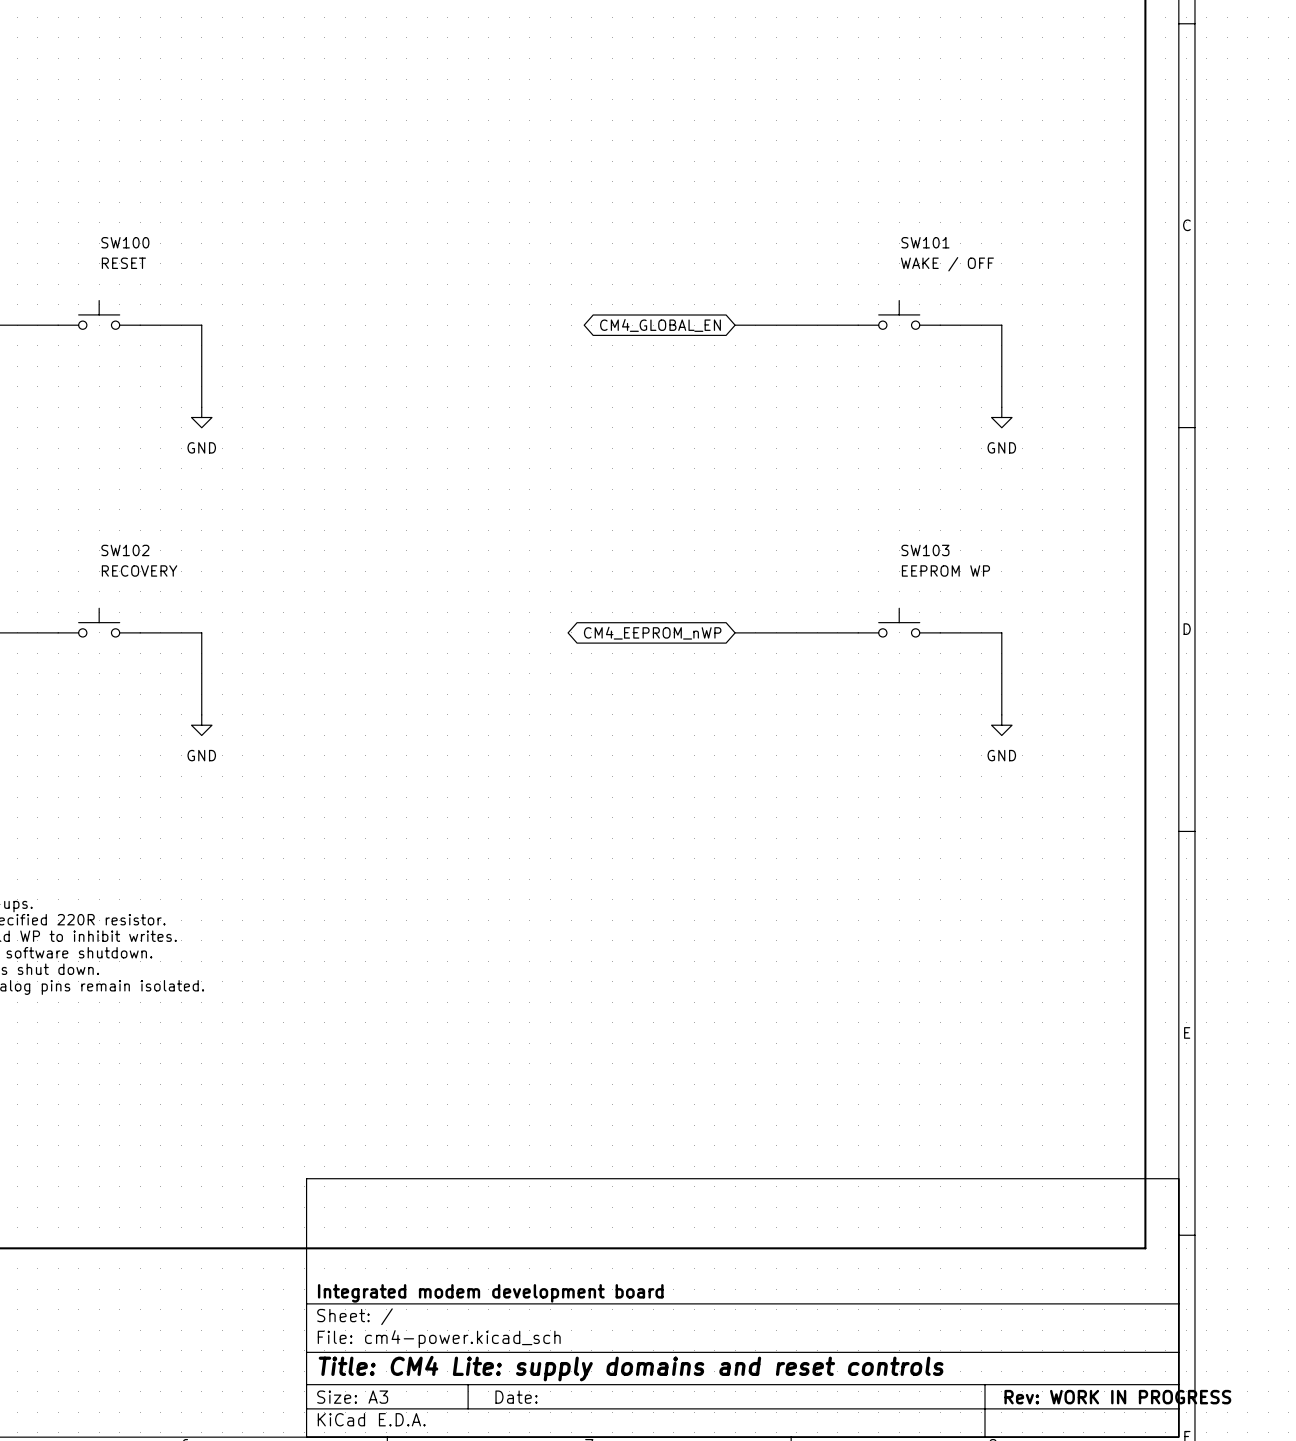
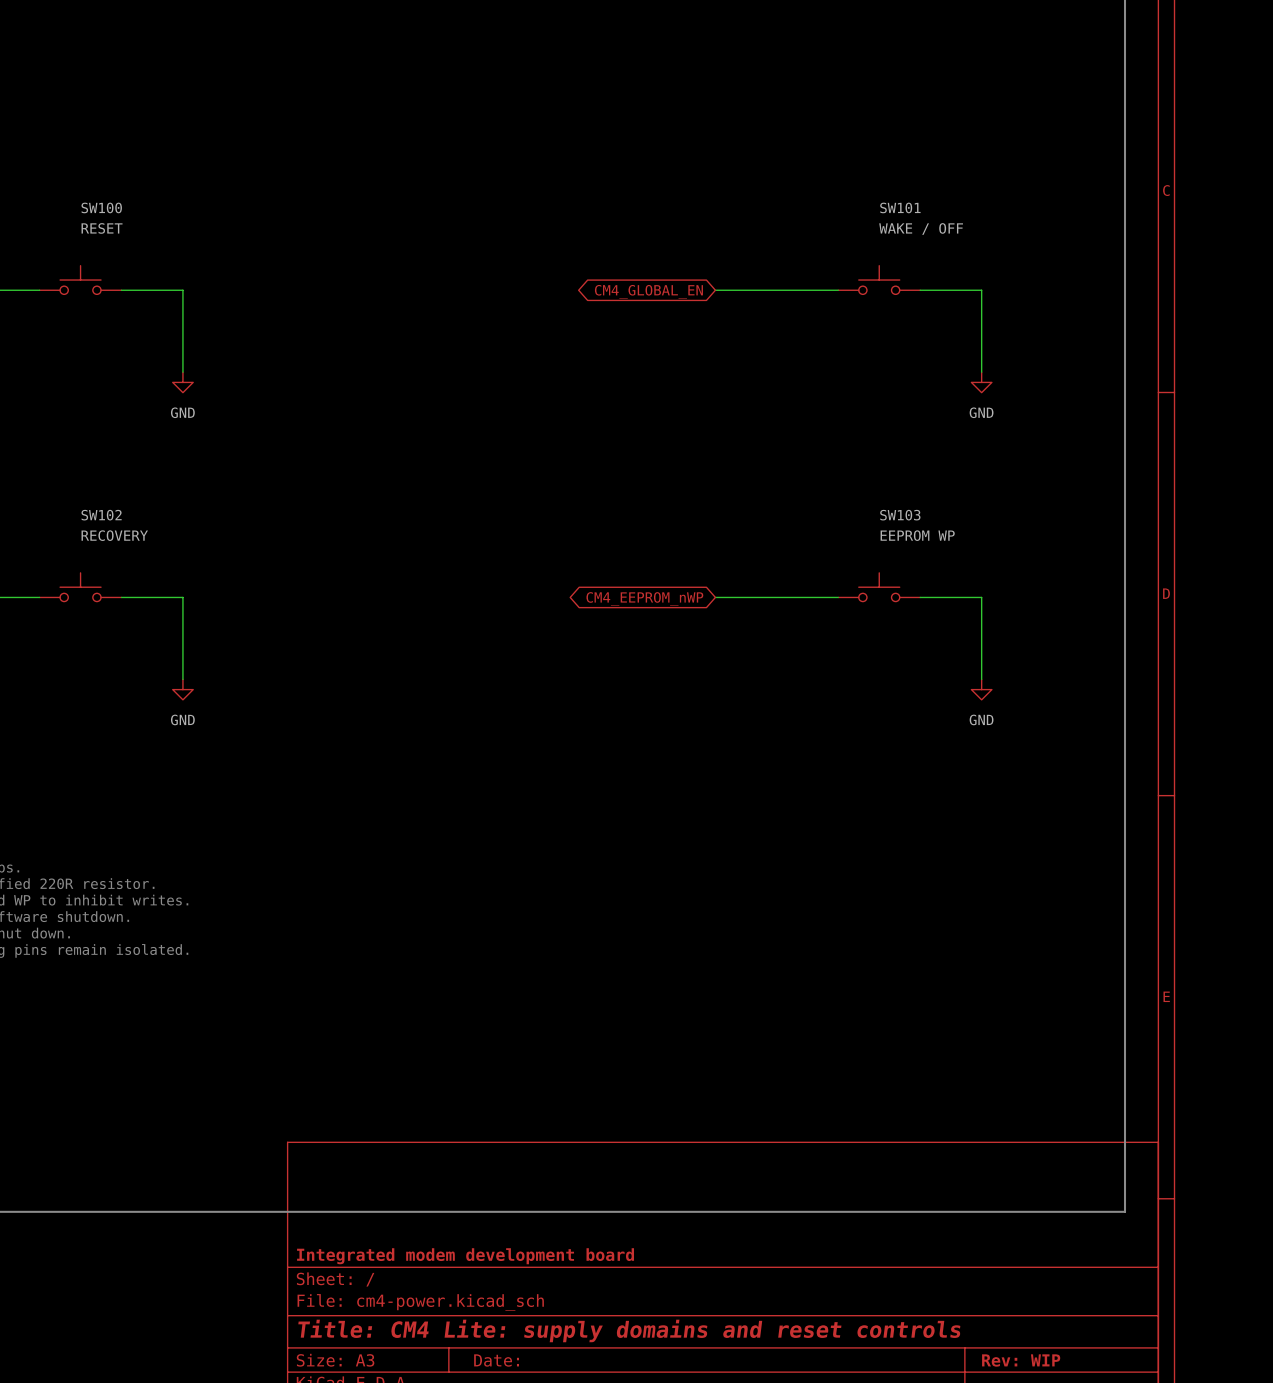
title block: Rev: WORK IN PROGRESS (1117, 1397) -> Rev: WIP (1021, 1360)

